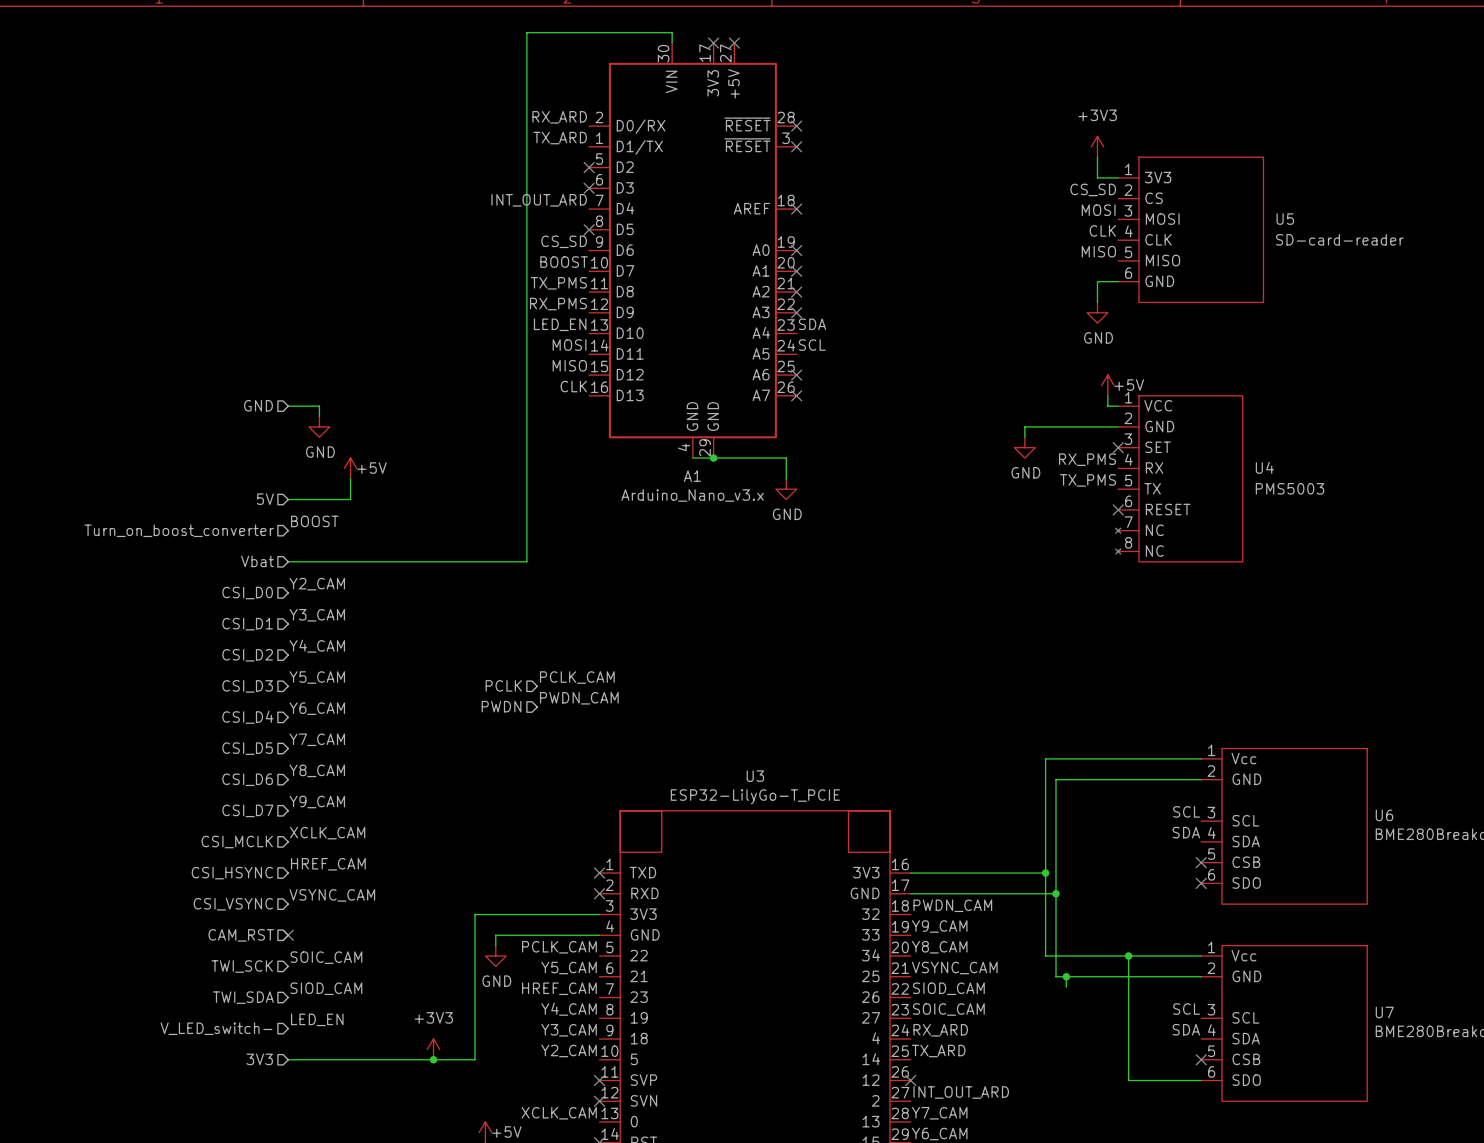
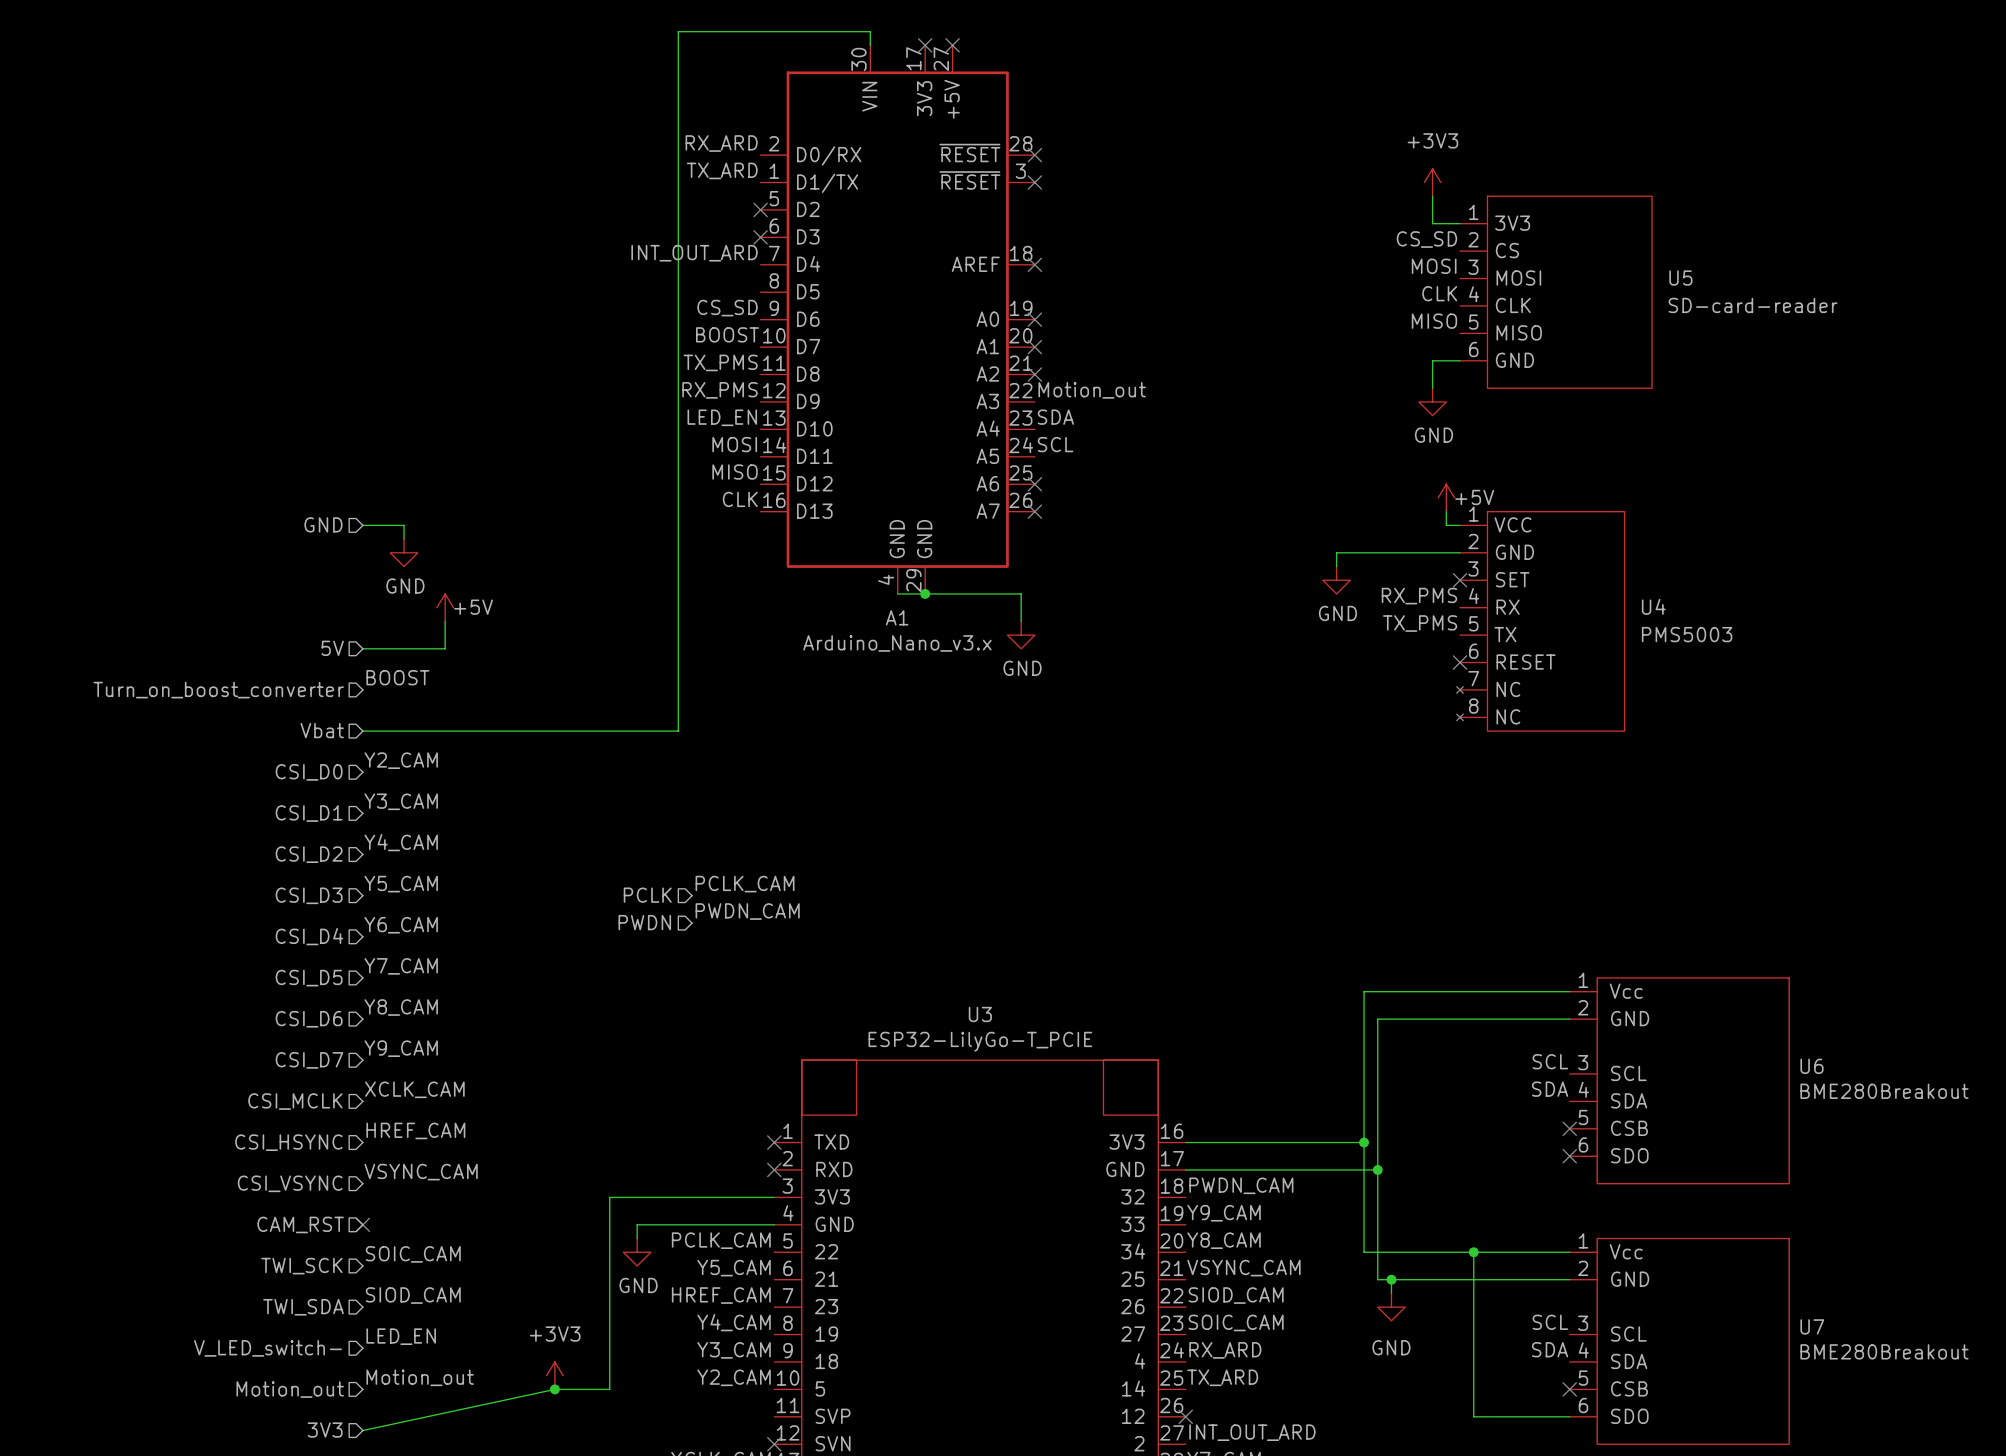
no-connect mark: (589, 229) -> none
label: none -> Motion_out (1092, 390)
no-connect mark: (796, 312) -> none
power symbol: none -> GND (1391, 1307)
label: none -> Motion_out (420, 1377)
hierarchical label: 3V3 (259, 1059) -> Motion_out (290, 1389)
wire: (288, 1059) (433, 1059) -> (362, 1430) (554, 1389)
no-connect mark: (599, 1080) -> none
hierarchical label: none -> 3V3 (325, 1430)

